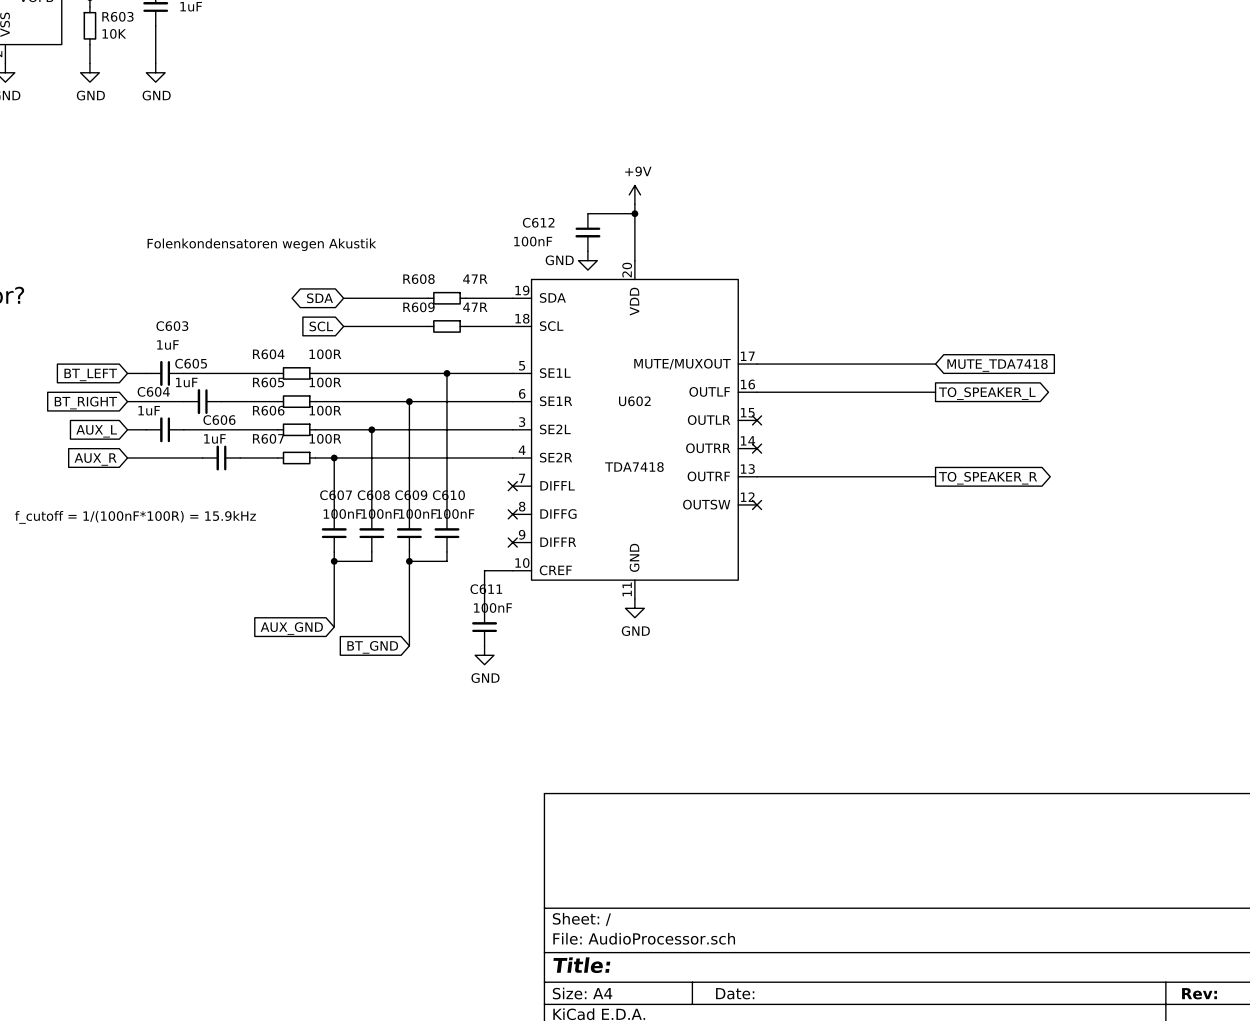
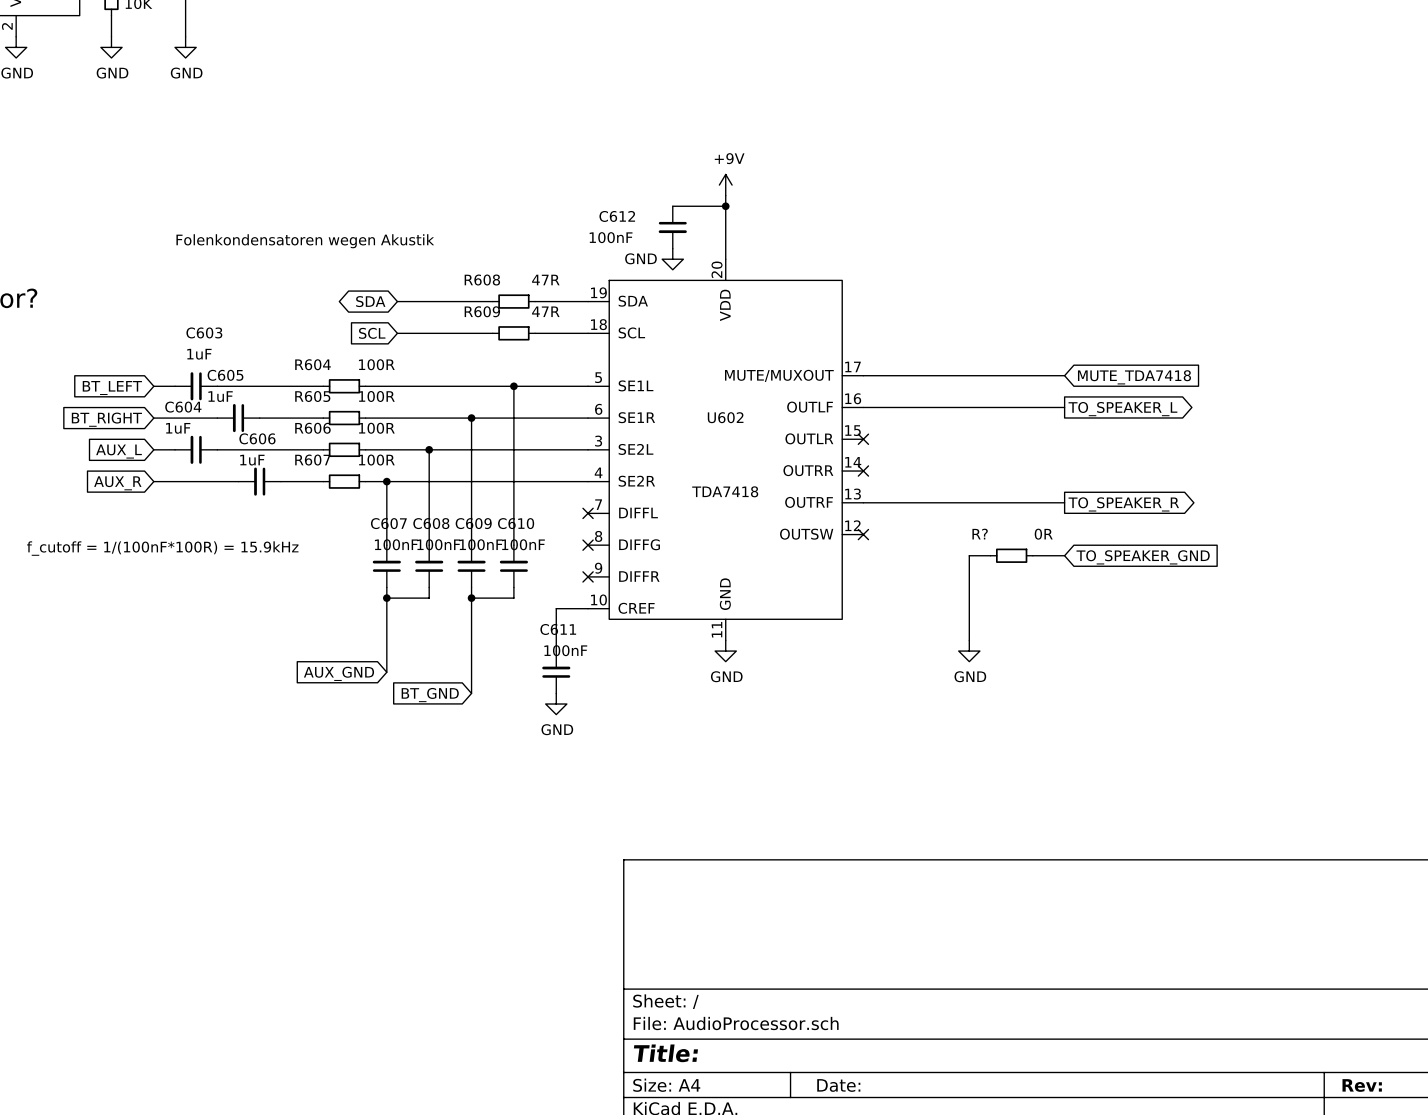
wire: none -> (990, 555) (969, 555) (969, 640)
R?: none -> 0R (1011, 555)
wire: none -> (1032, 555) (1064, 555)
global label: none -> TO_SPEAKER_GND (1143, 557)
power symbol: none -> GND (969, 651)

